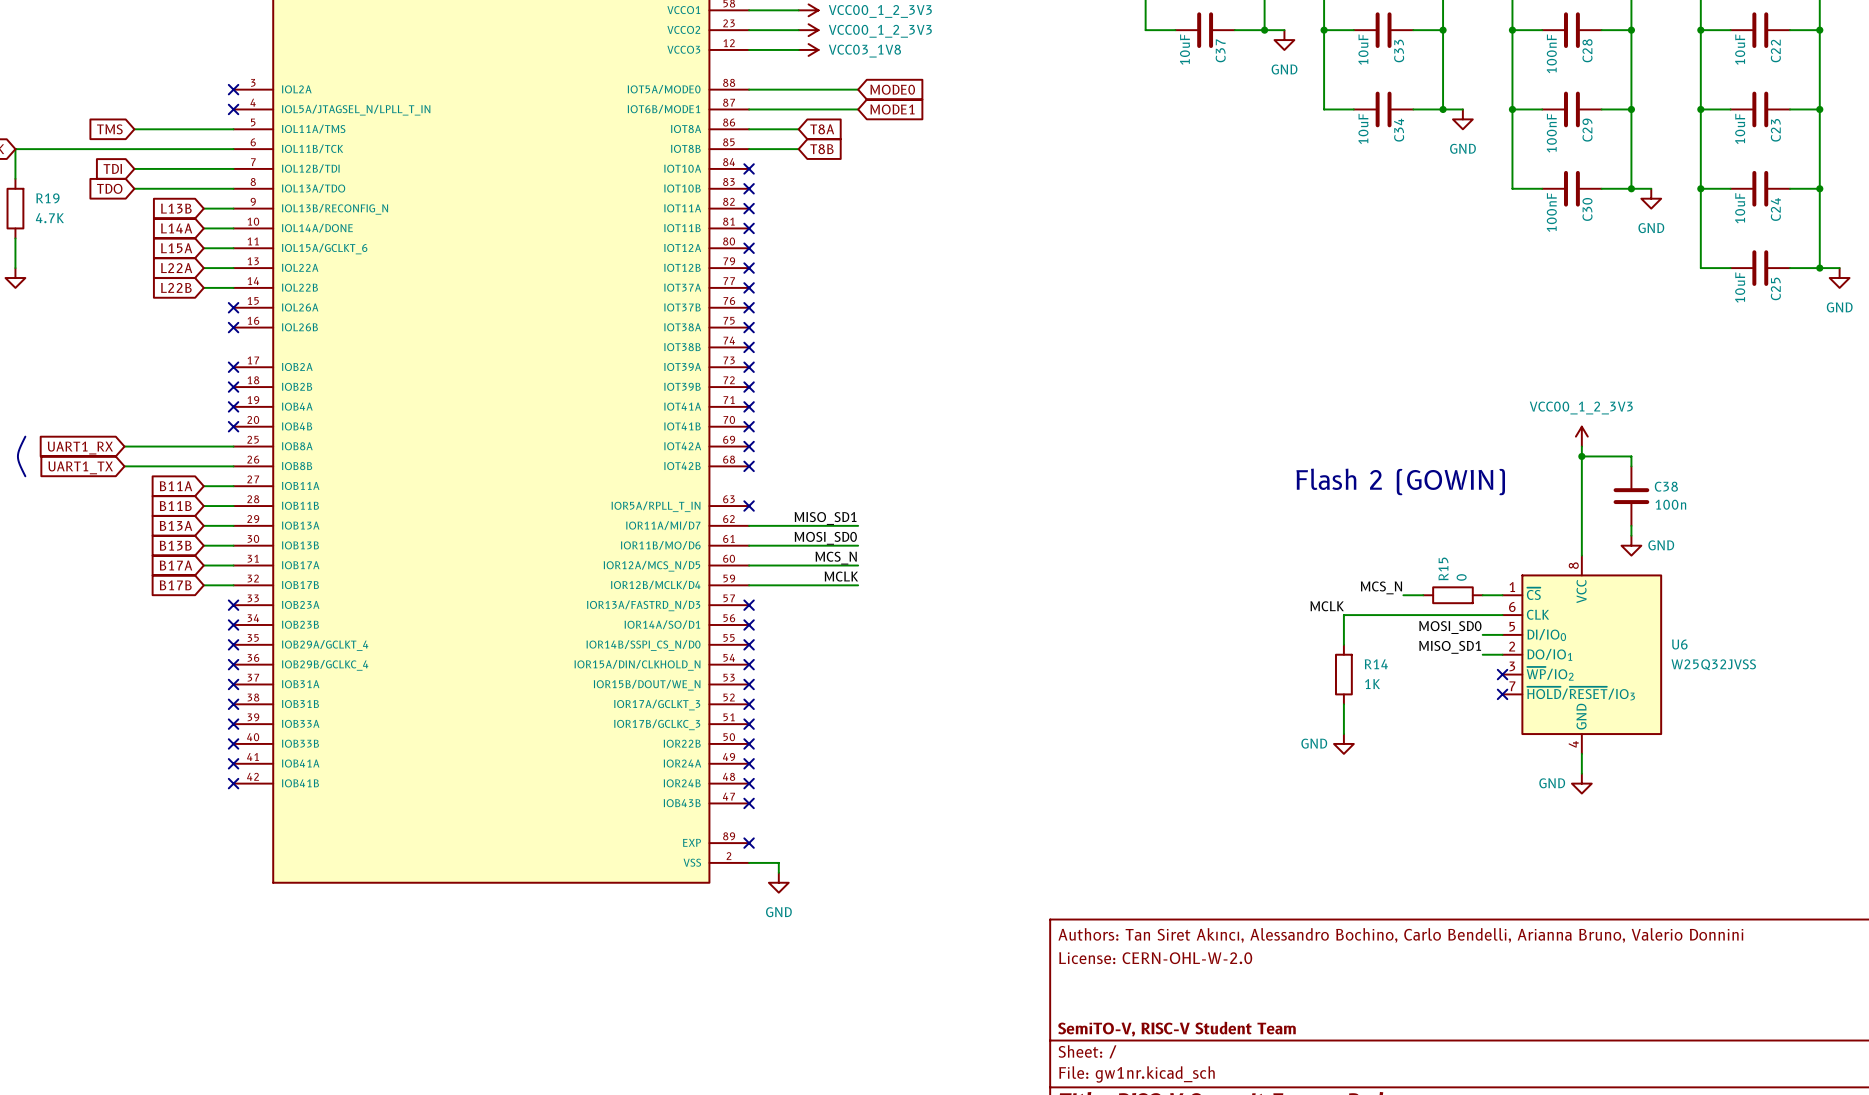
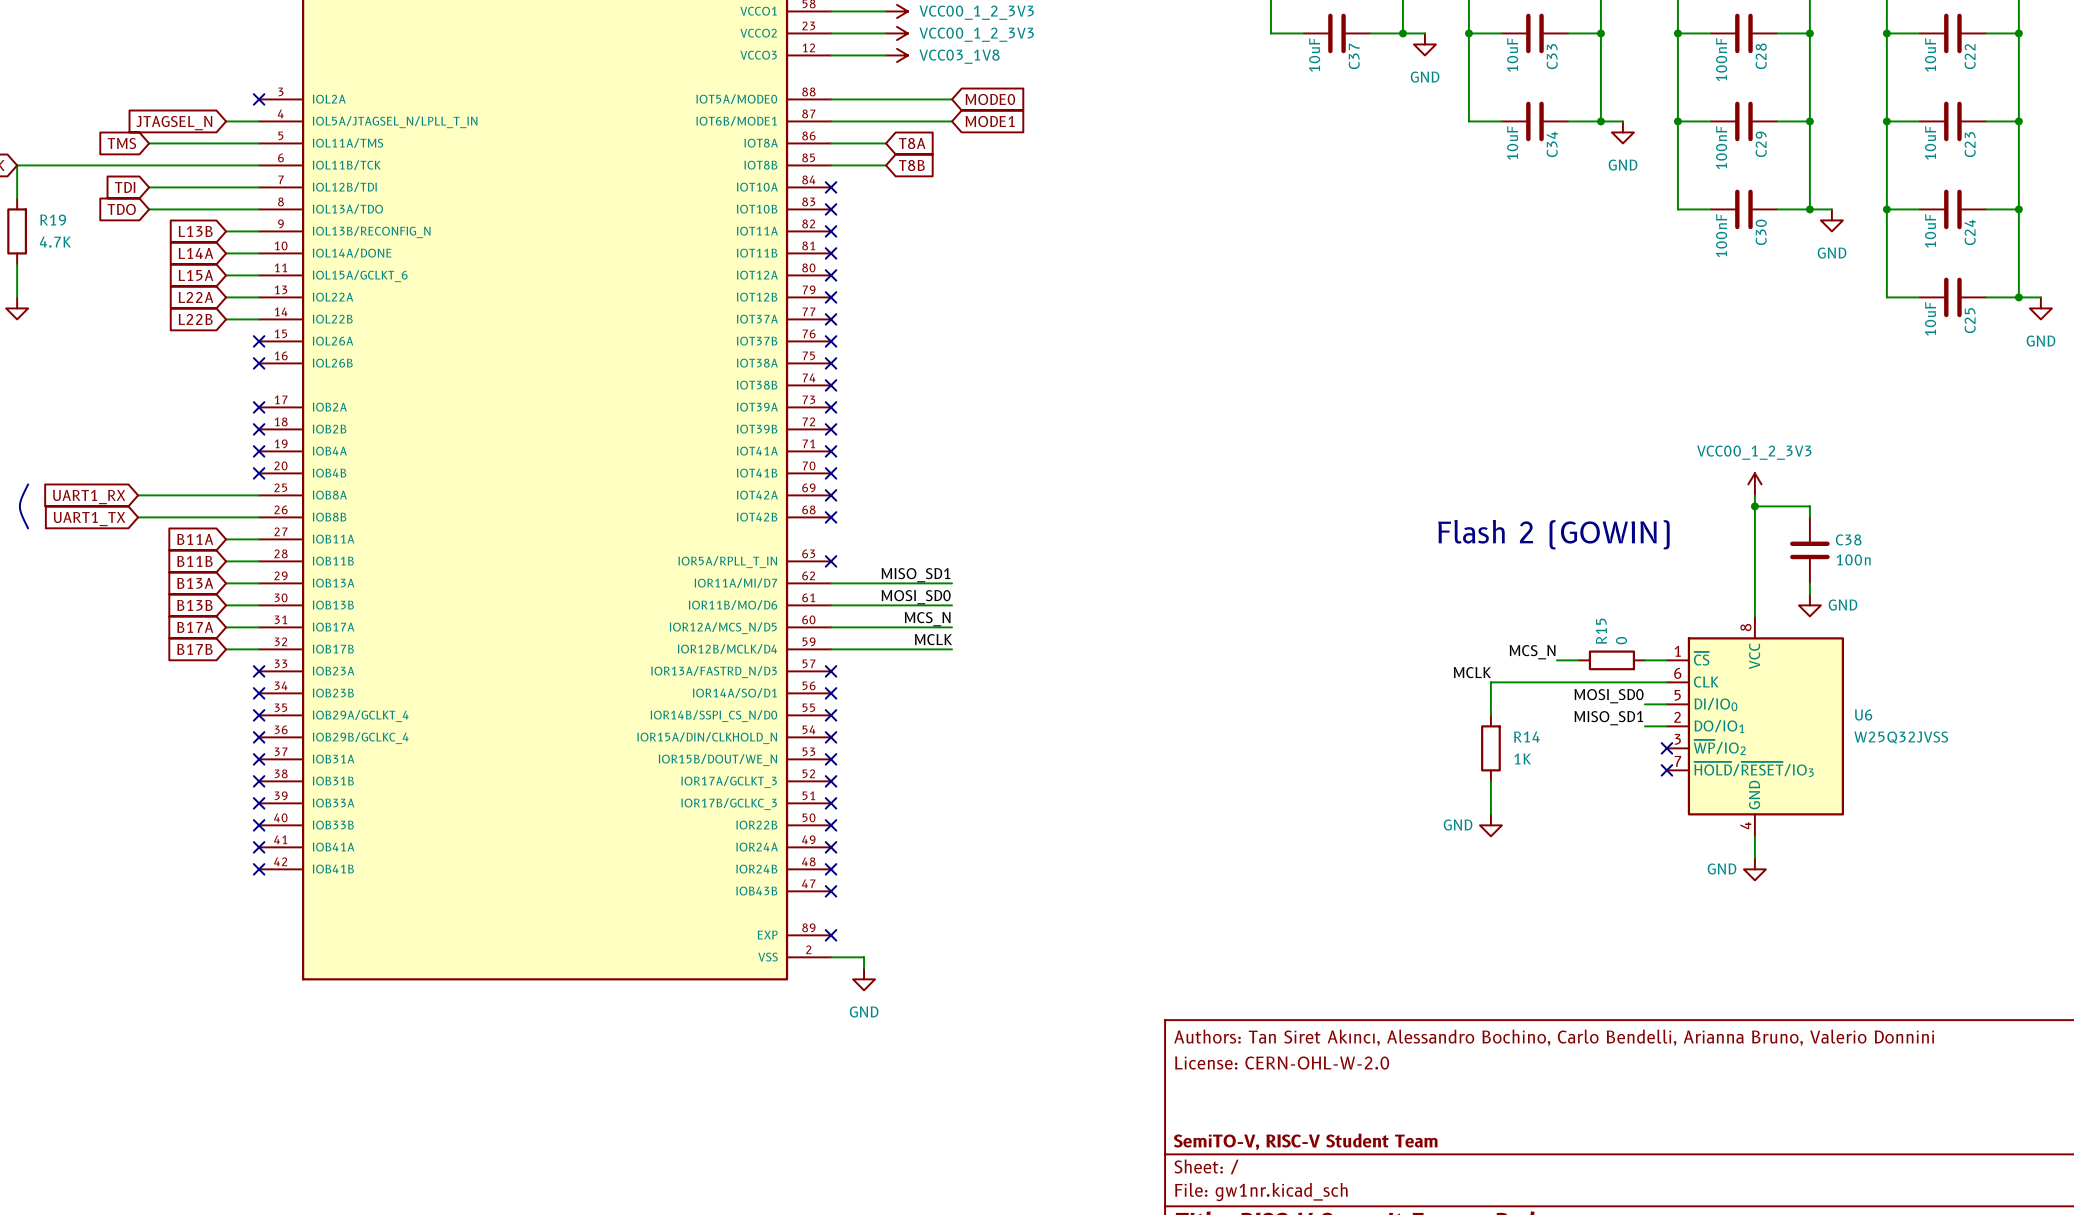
wire: none -> (226, 121) (259, 121)
no-connect mark: (233, 109) -> none
global label: none -> JTAGSEL_N (174, 123)

